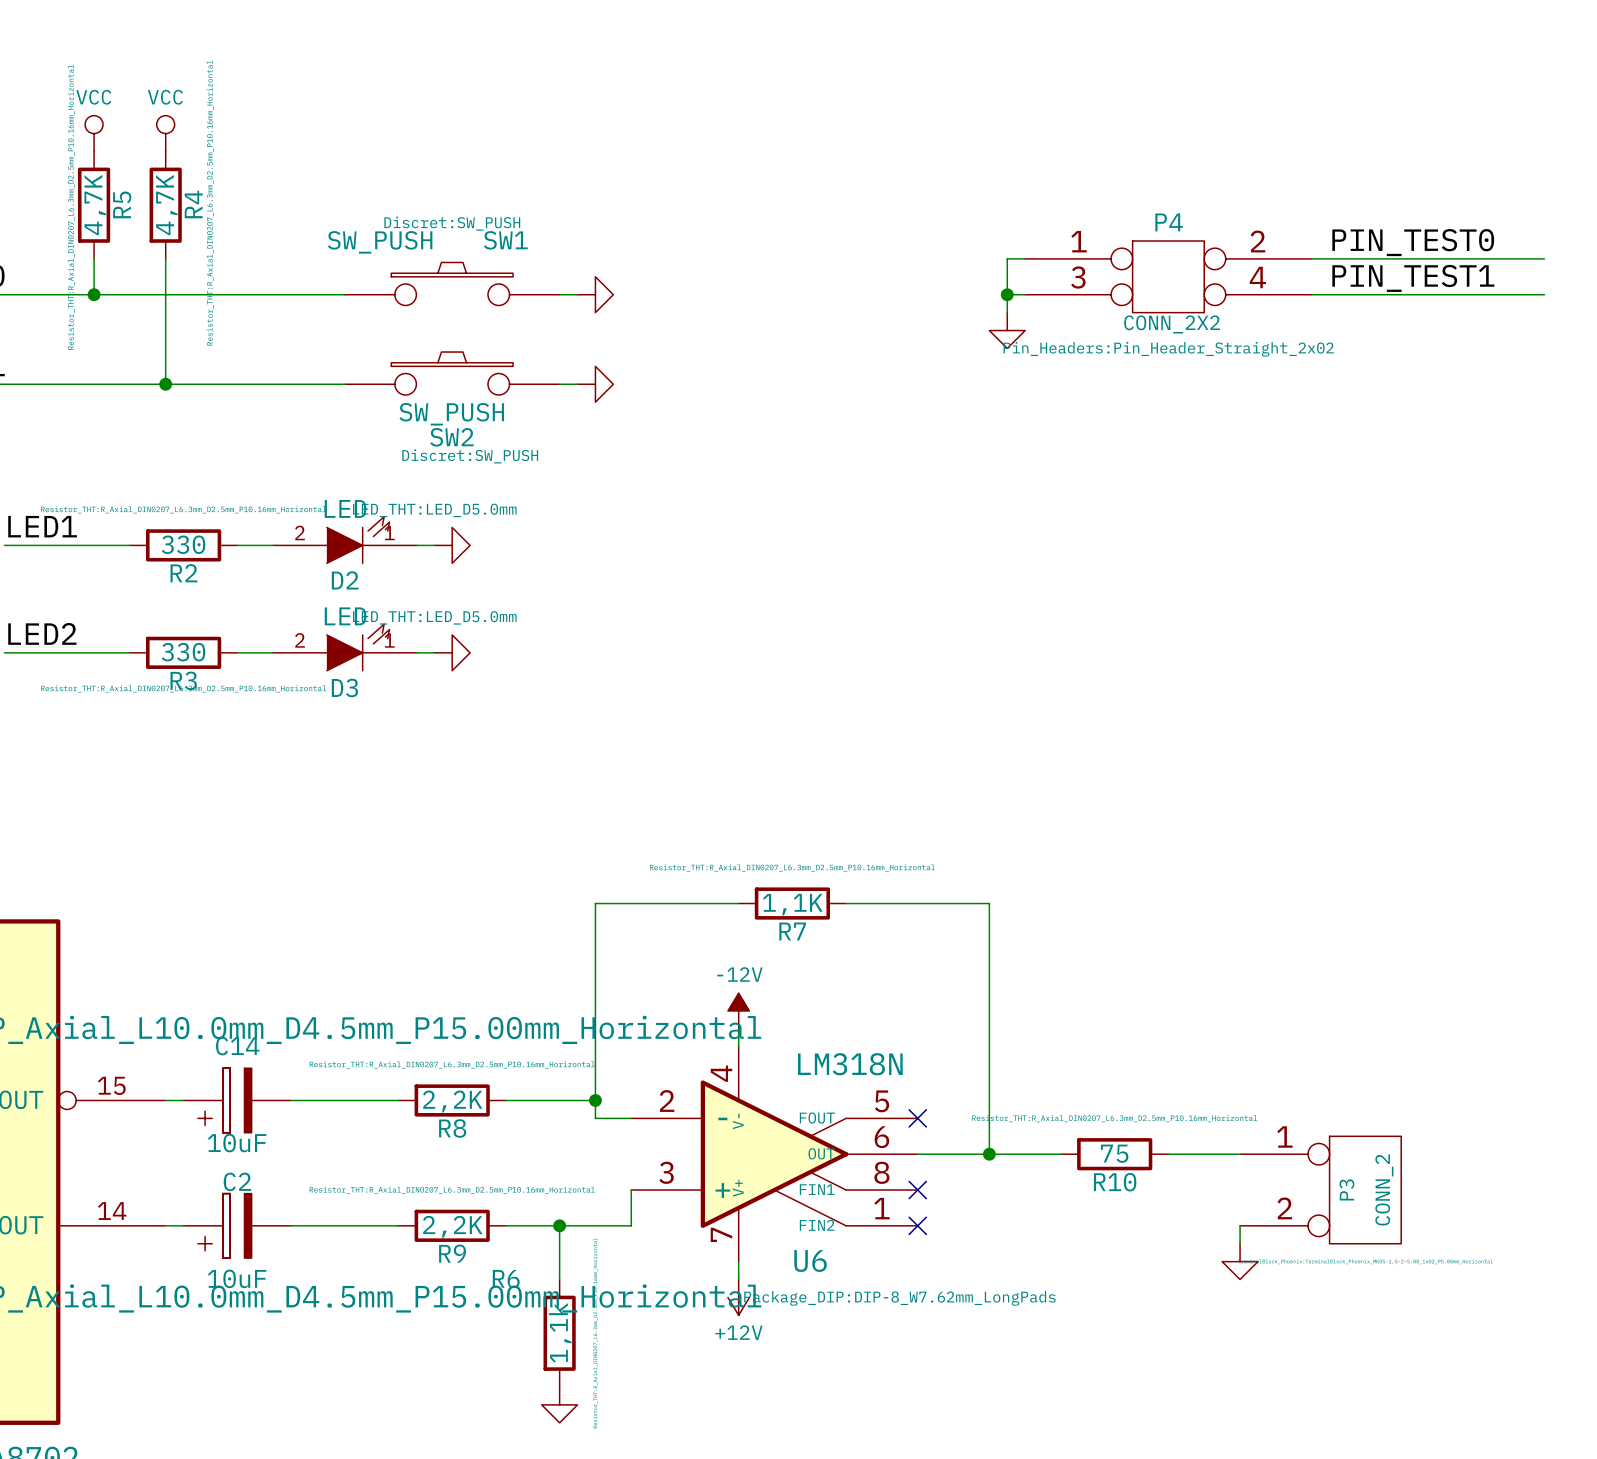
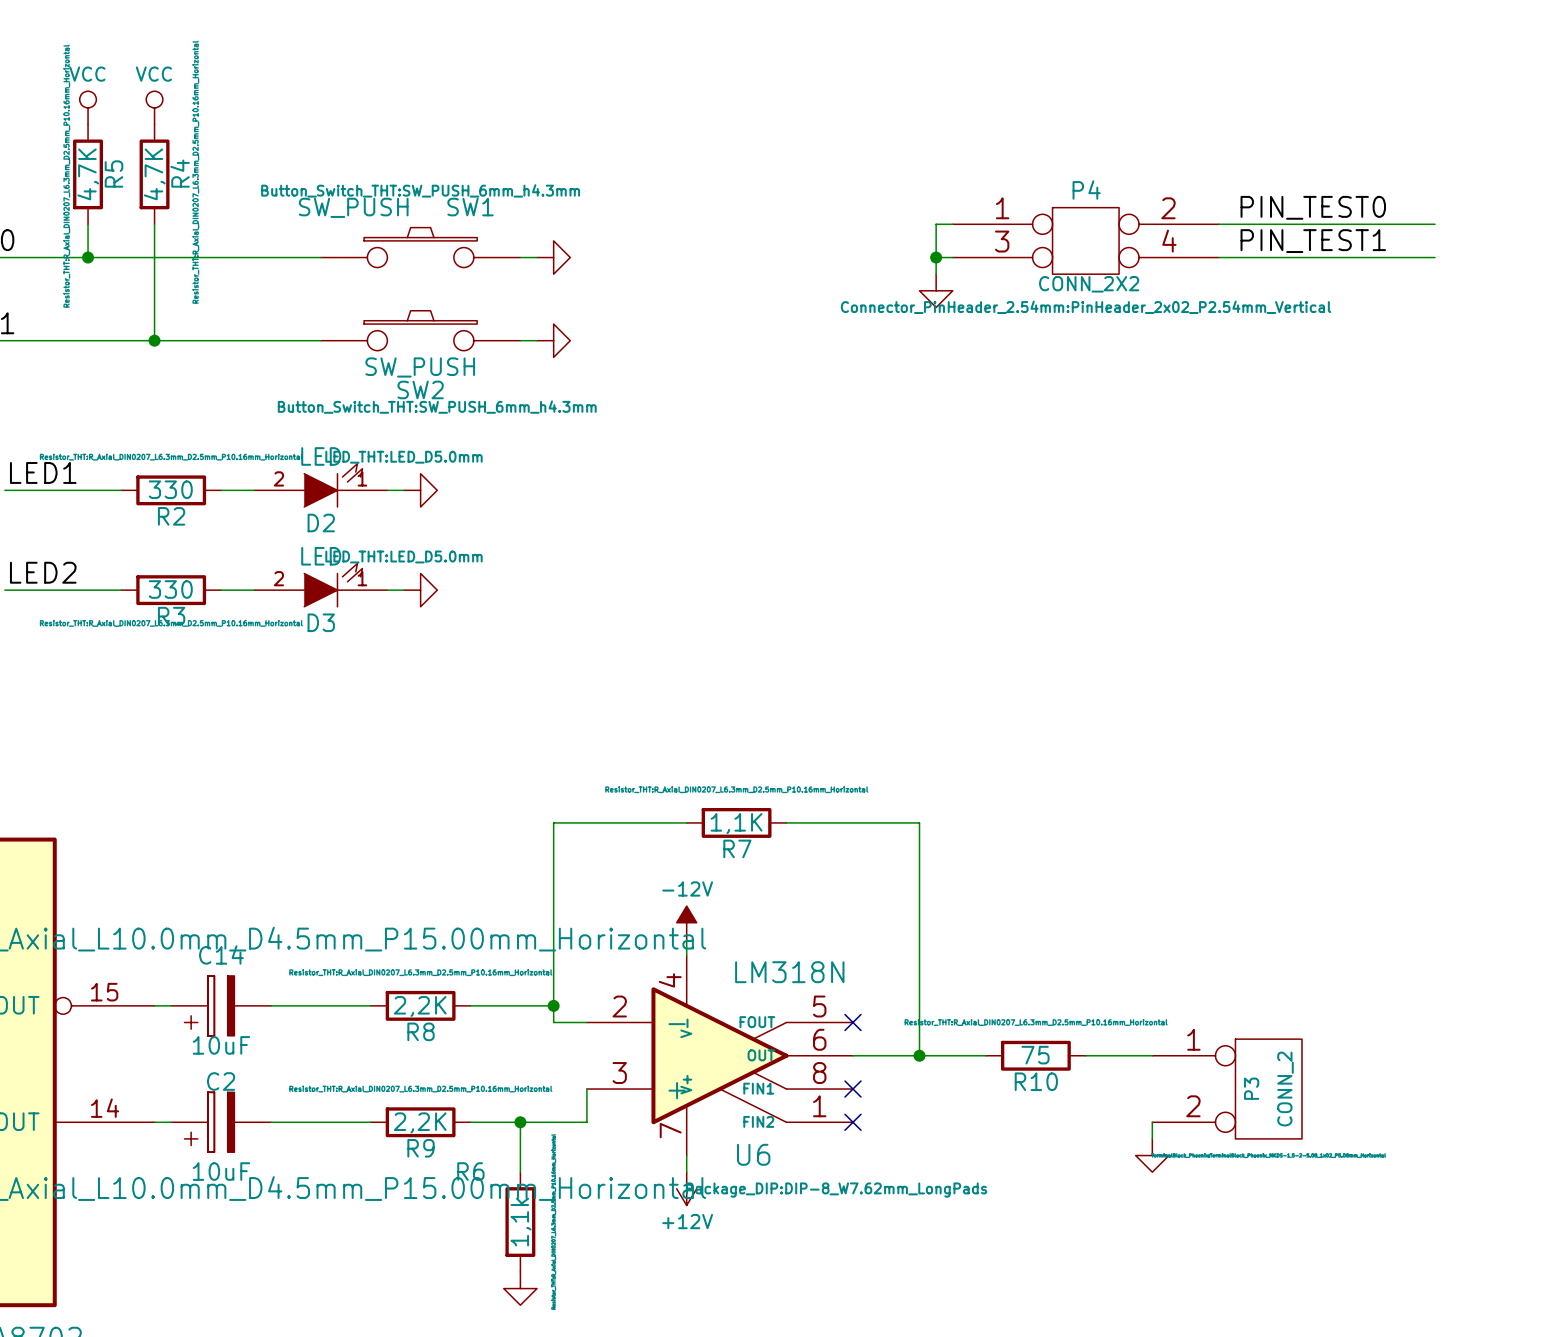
SW1 text: Discret:SW_PUSH (452, 223) -> Button_Switch_THT:SW_PUSH_6mm_h4.3mm (420, 190)
P4 text: Pin_Headers:Pin_Header_Straight_2x02 (1168, 349) -> Connector_PinHeader_2.54mm:PinHeader_2x02_P2.54mm_Vertical (1086, 307)
SW2 text: Discret:SW_PUSH (470, 456) -> Button_Switch_THT:SW_PUSH_6mm_h4.3mm (437, 407)

